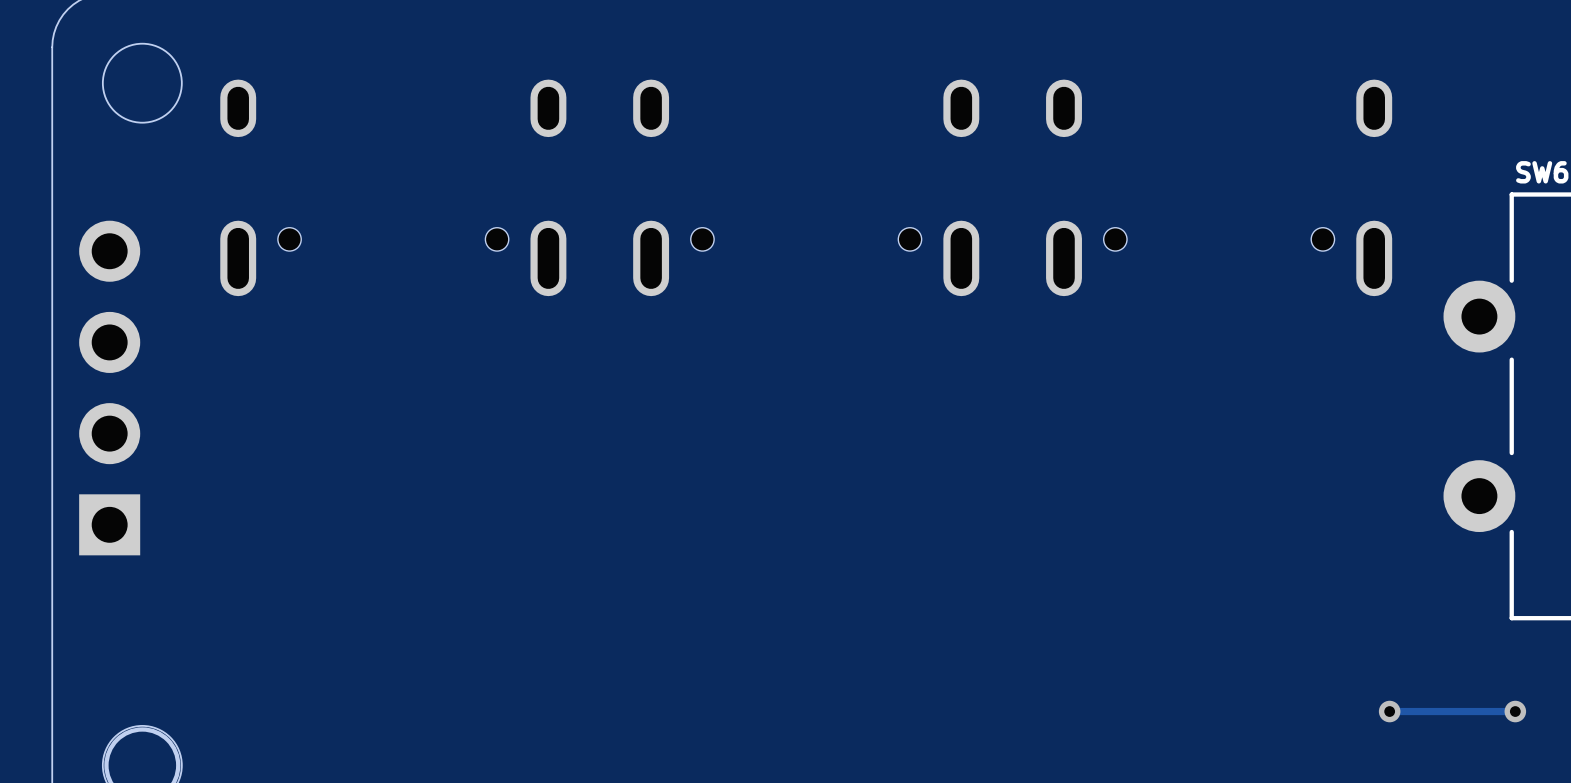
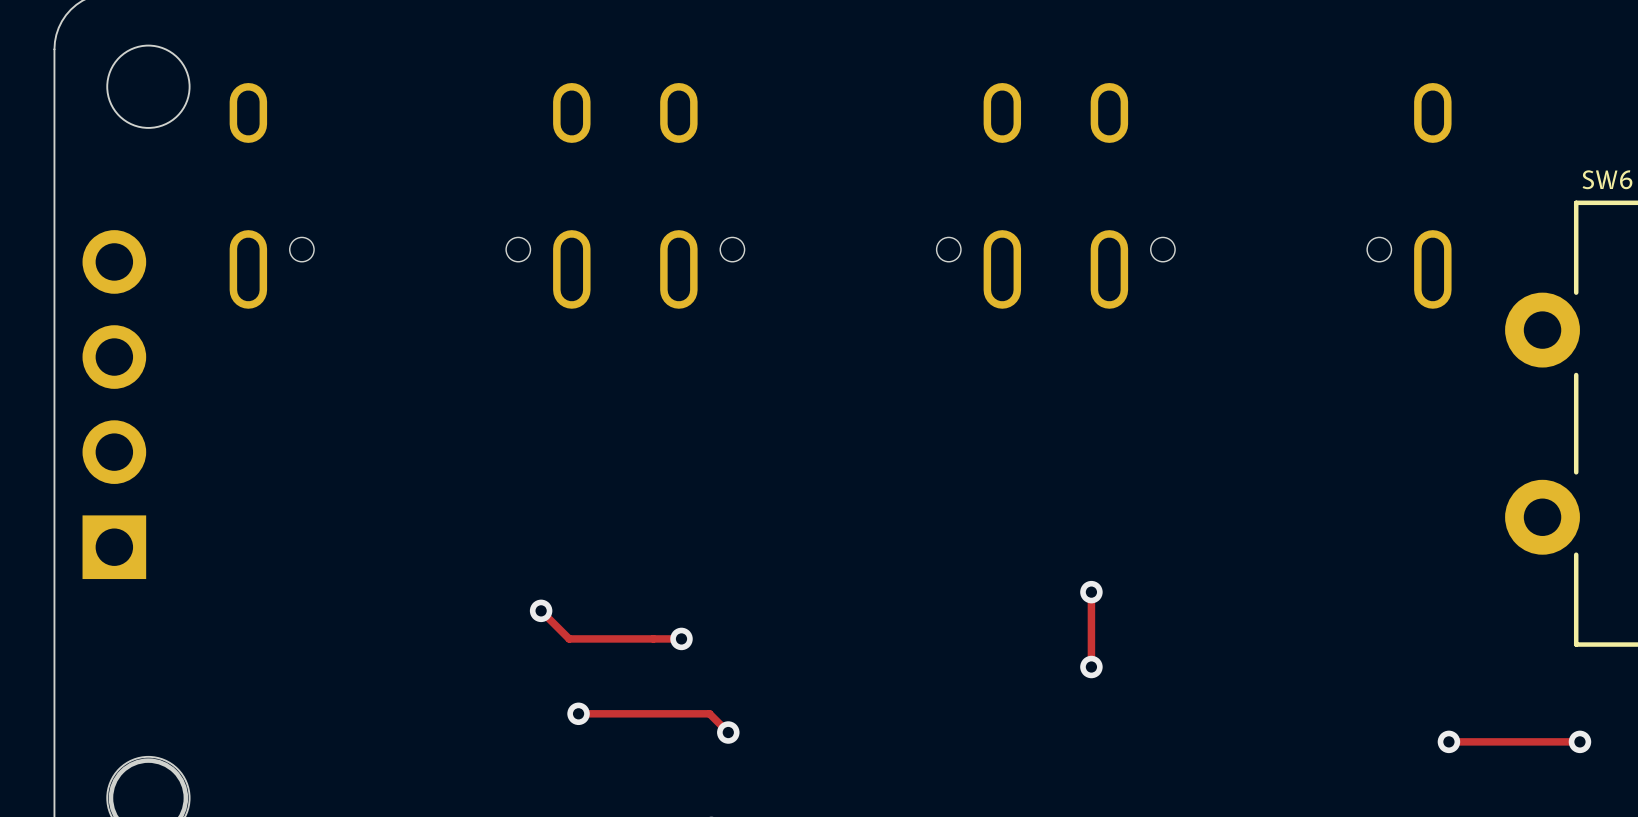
track: none -> (1091, 592) (1091, 667)
via: none -> (1091, 592)
track: none -> (541, 610) (569, 638) (681, 638)
via: none -> (541, 610)
via: none -> (681, 638)
via: none -> (1091, 667)
track: none -> (578, 713) (709, 713) (728, 732)
via: none -> (578, 713)
via: none -> (728, 732)

